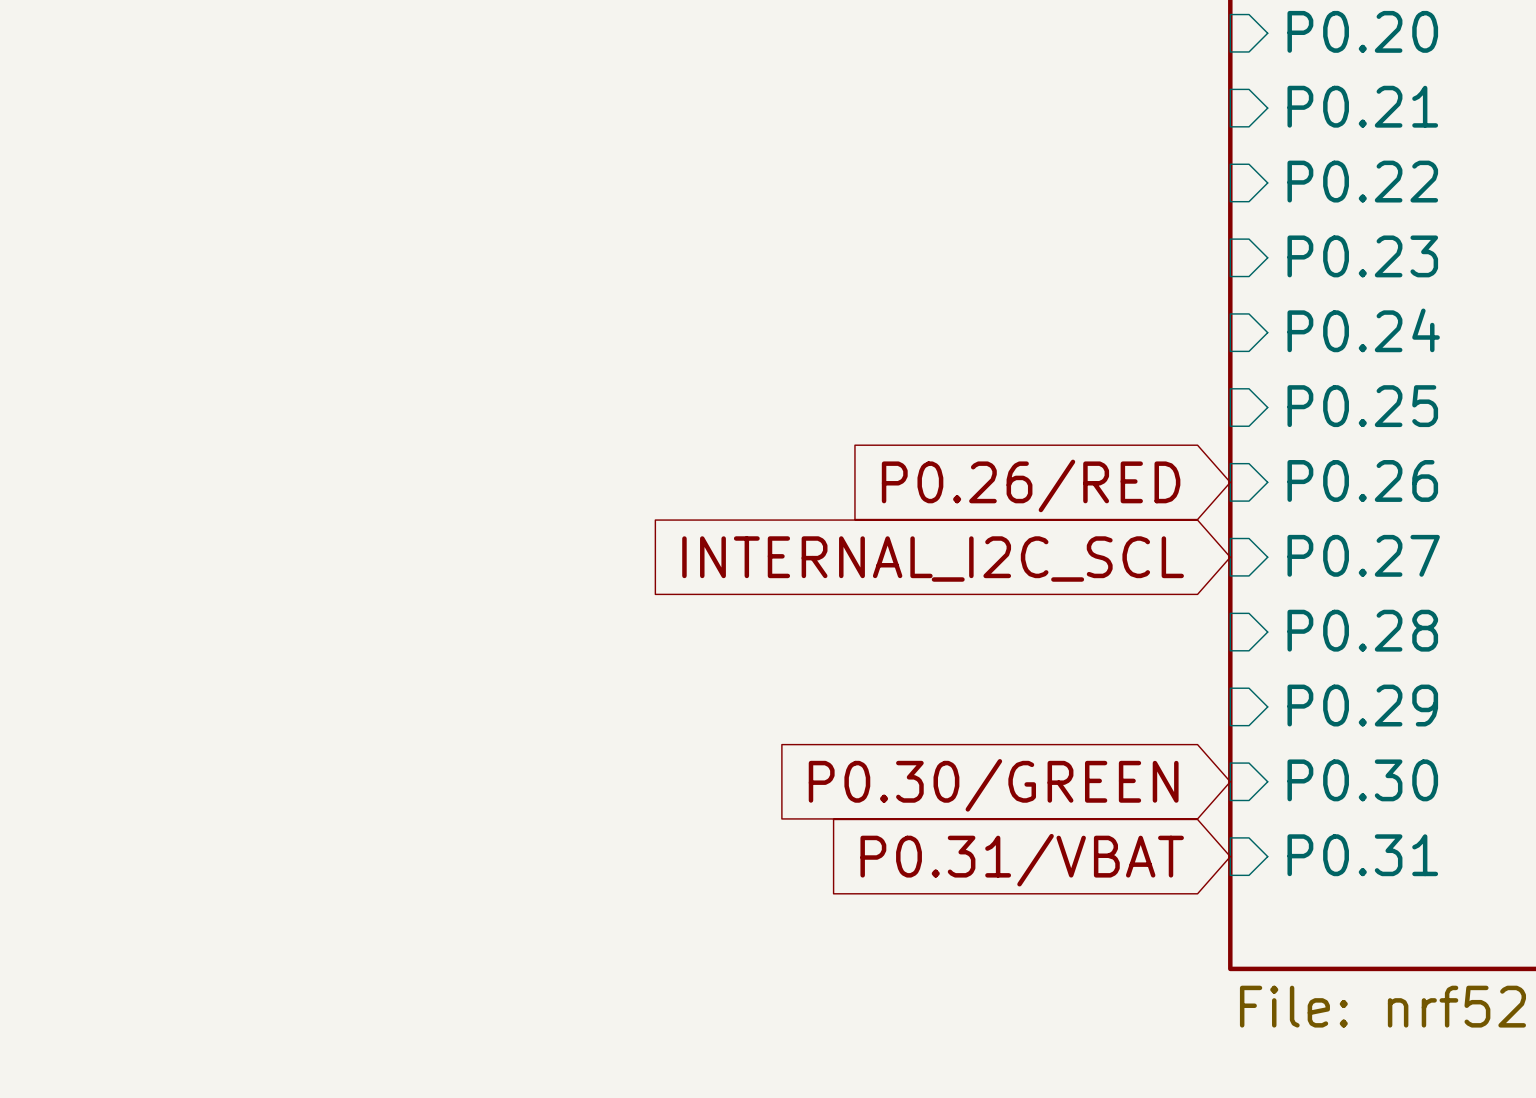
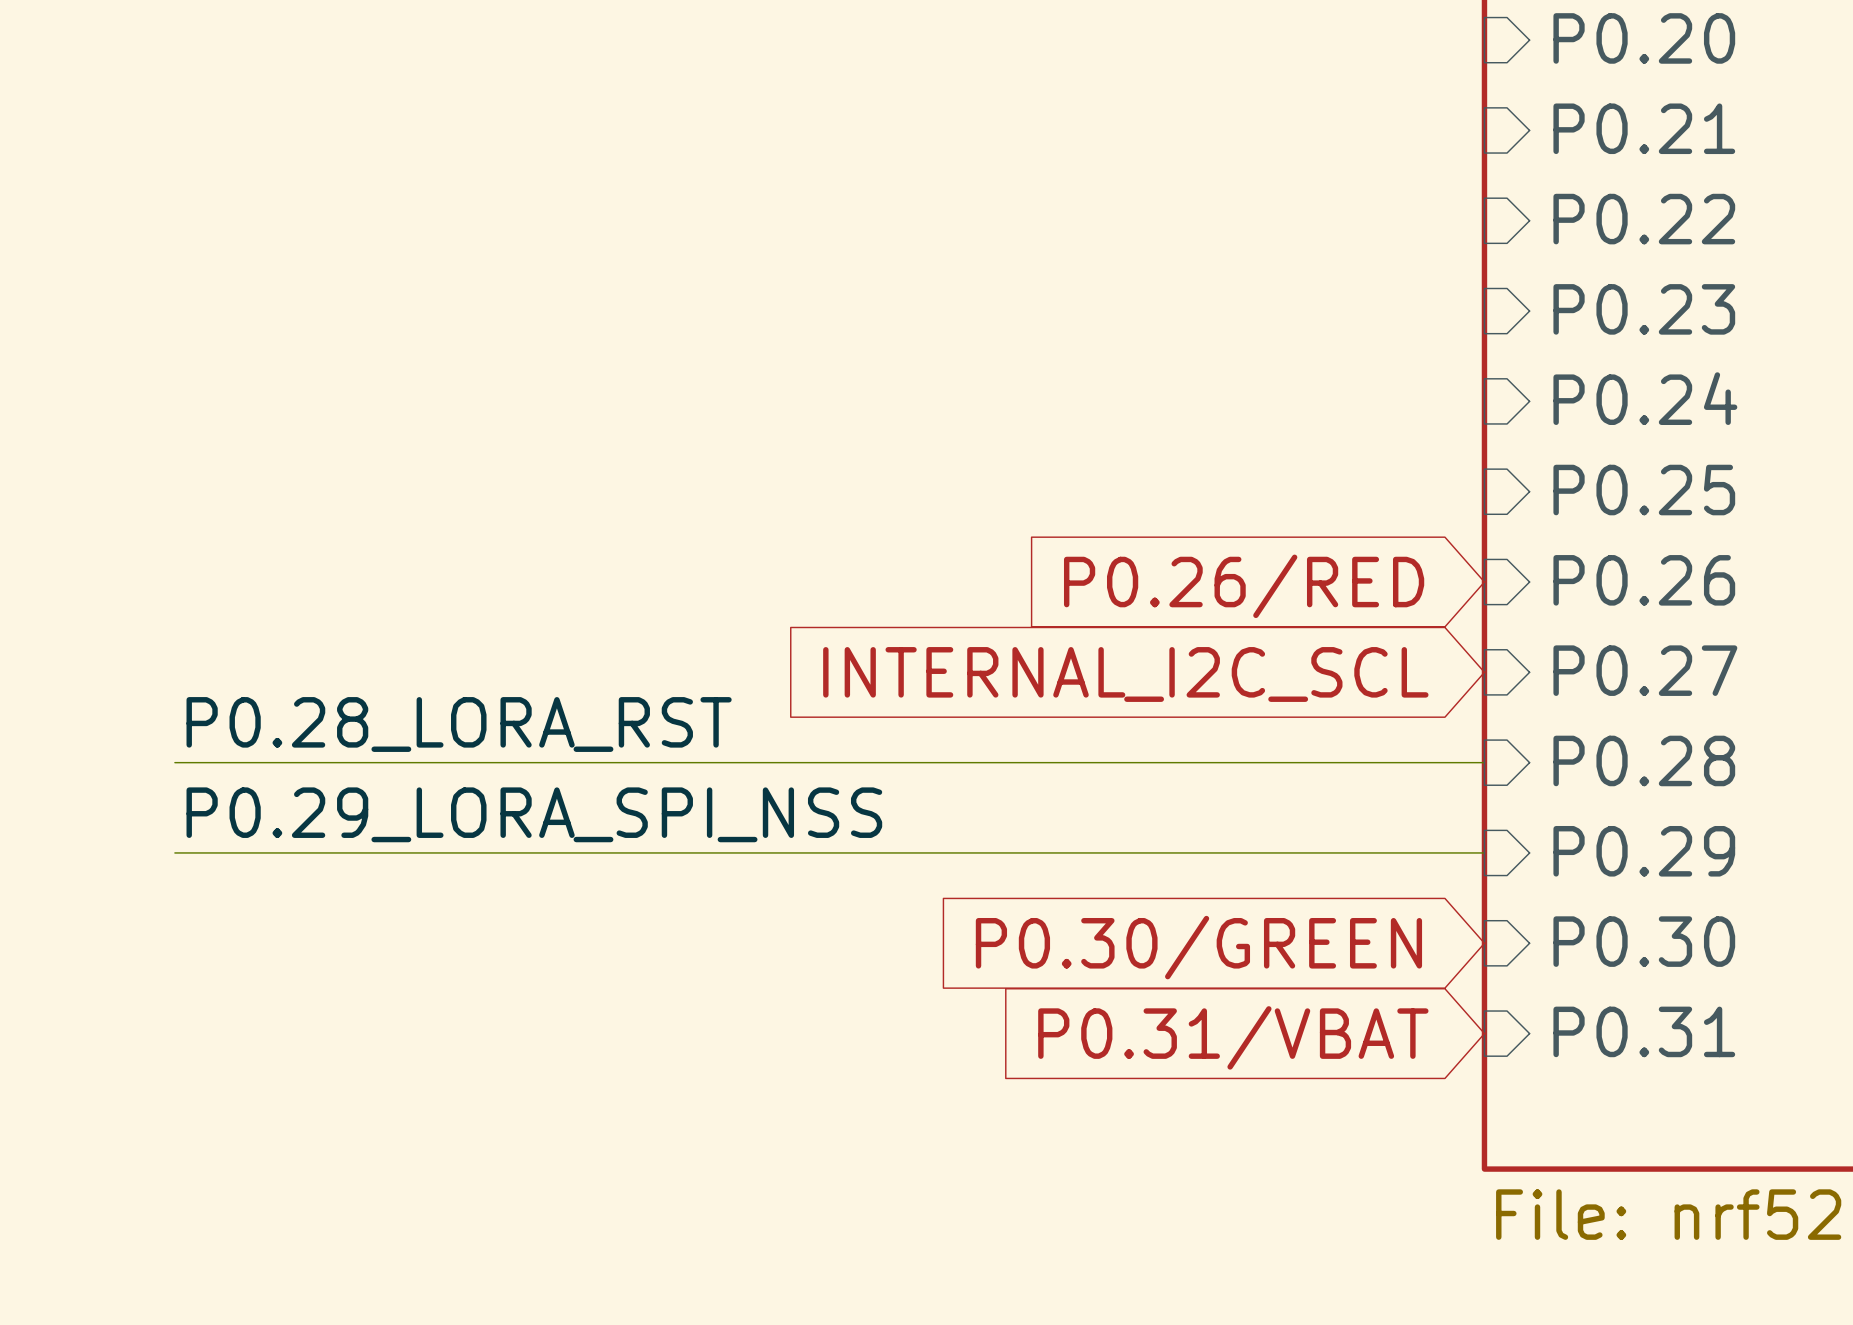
label: none -> P0.28_LORA_RST (459, 724)
wire: none -> (174, 762) (1484, 762)
label: none -> P0.29_LORA_SPI_NSS (534, 814)
wire: none -> (174, 852) (1484, 852)

